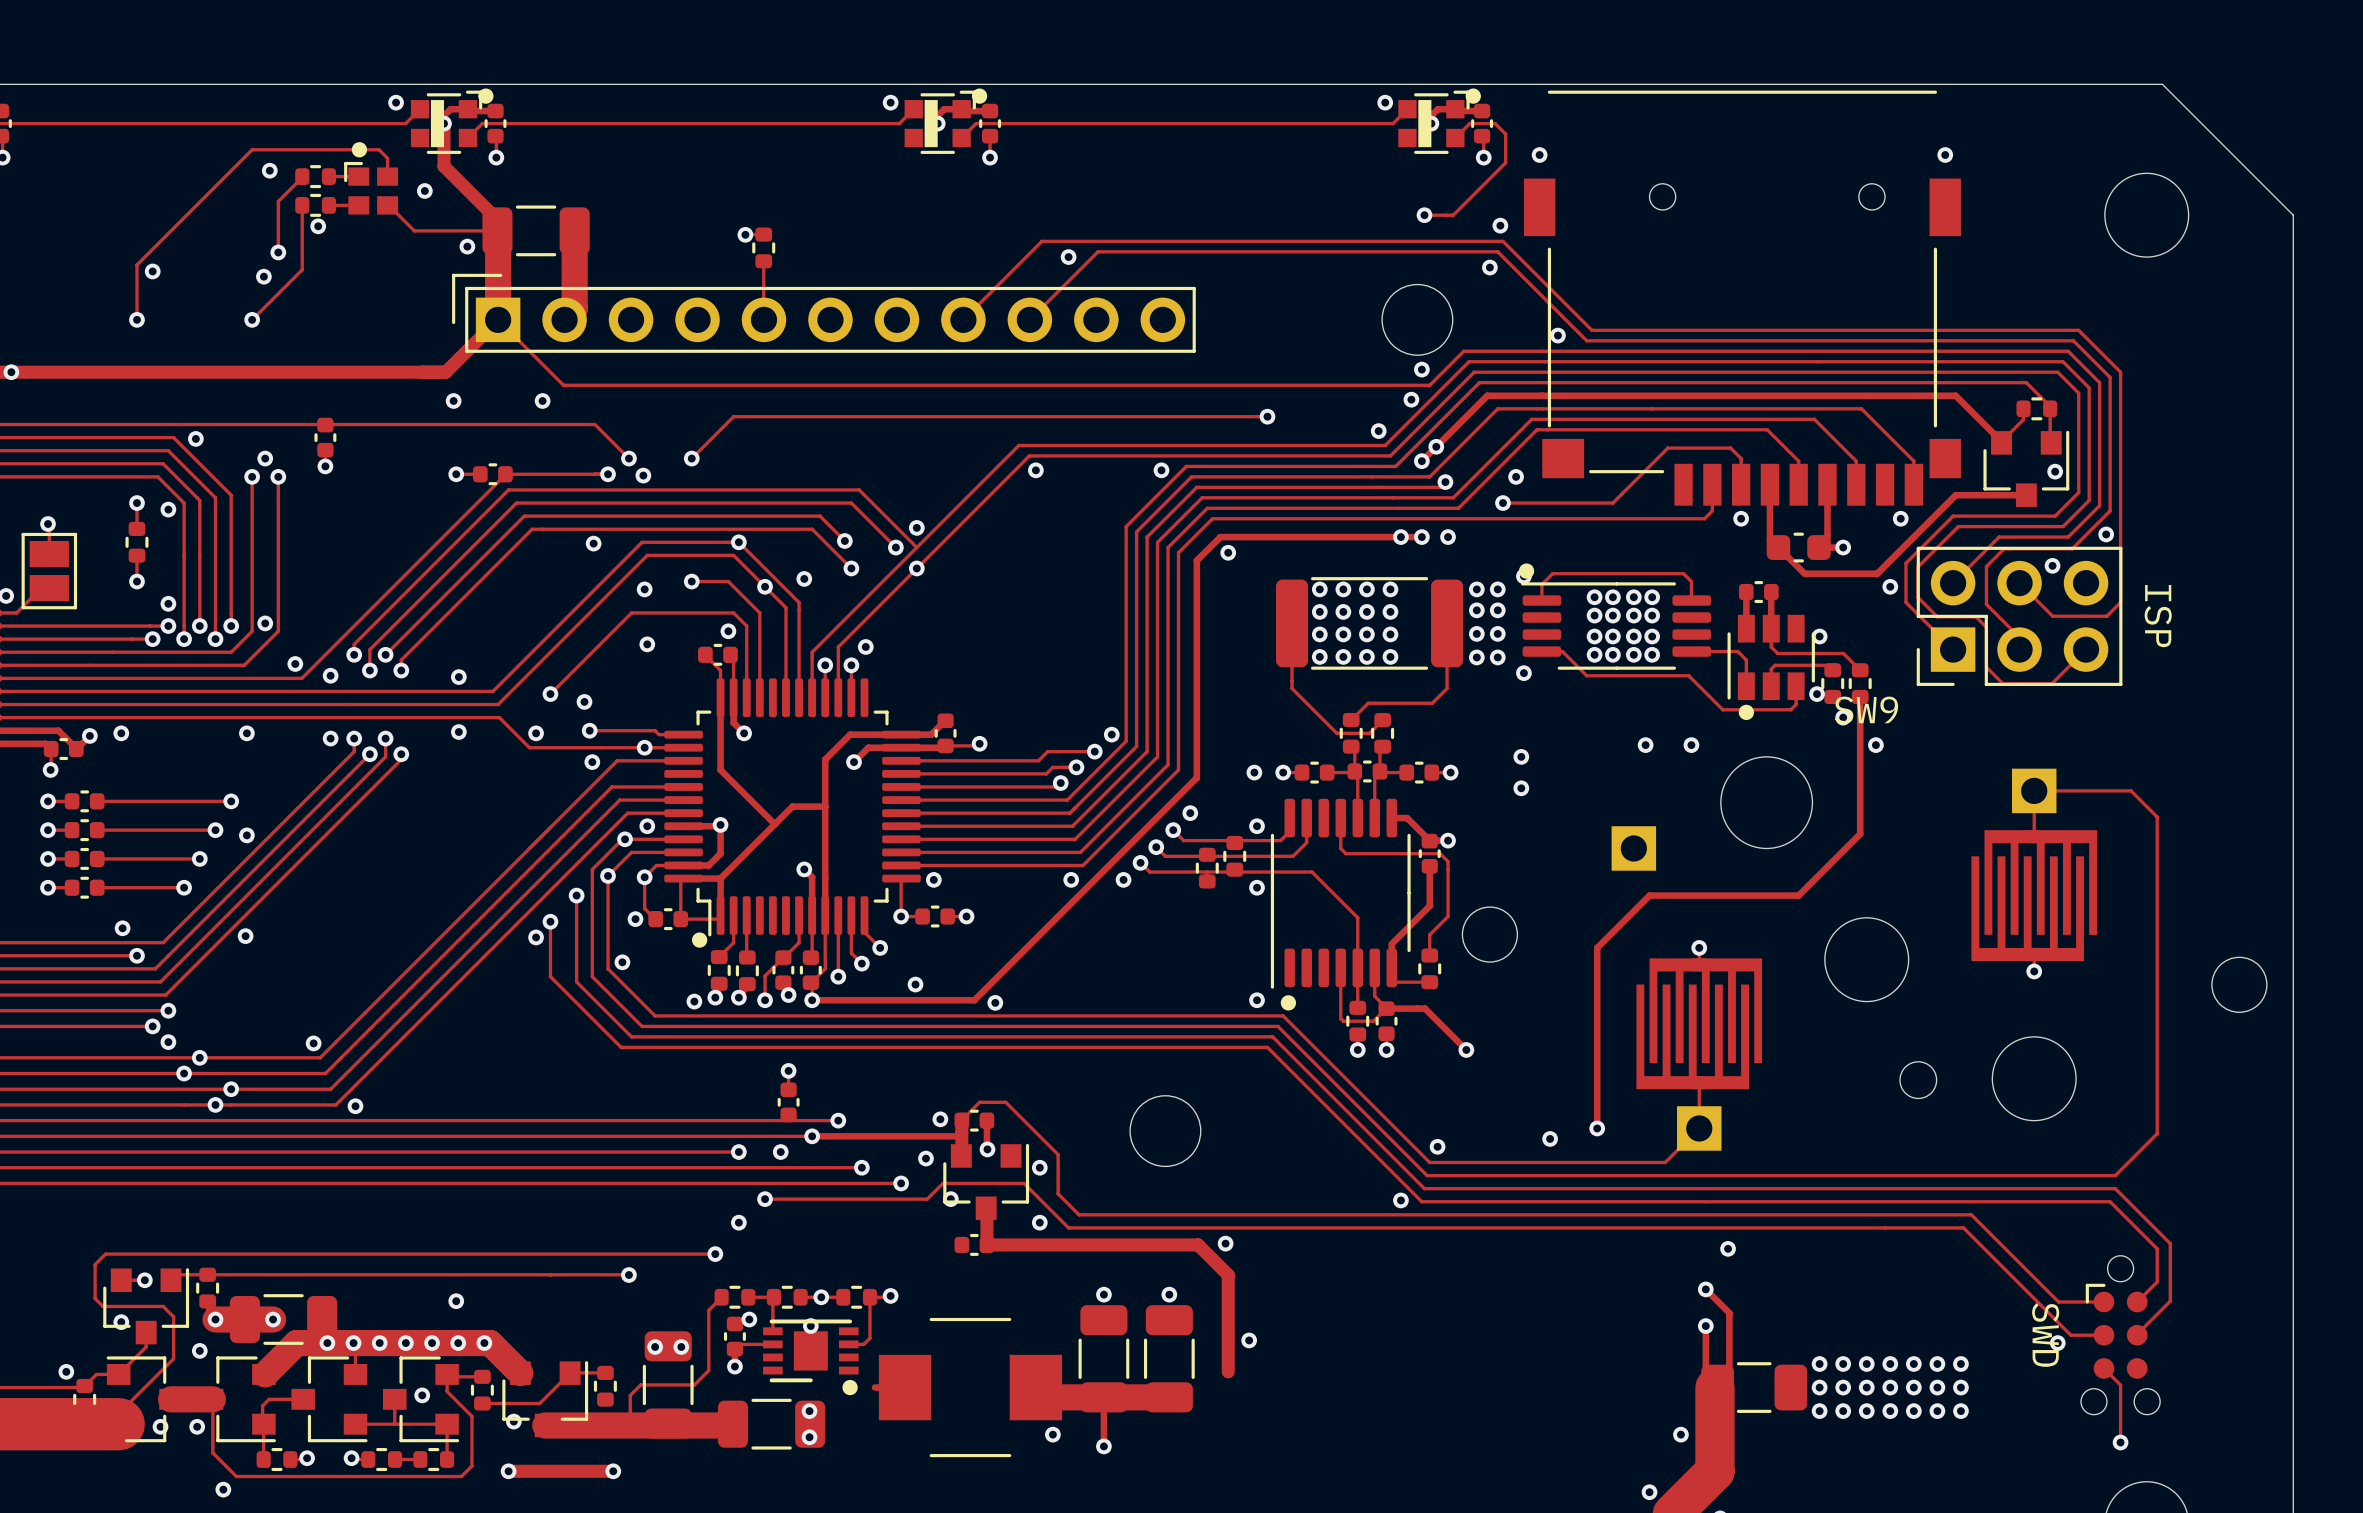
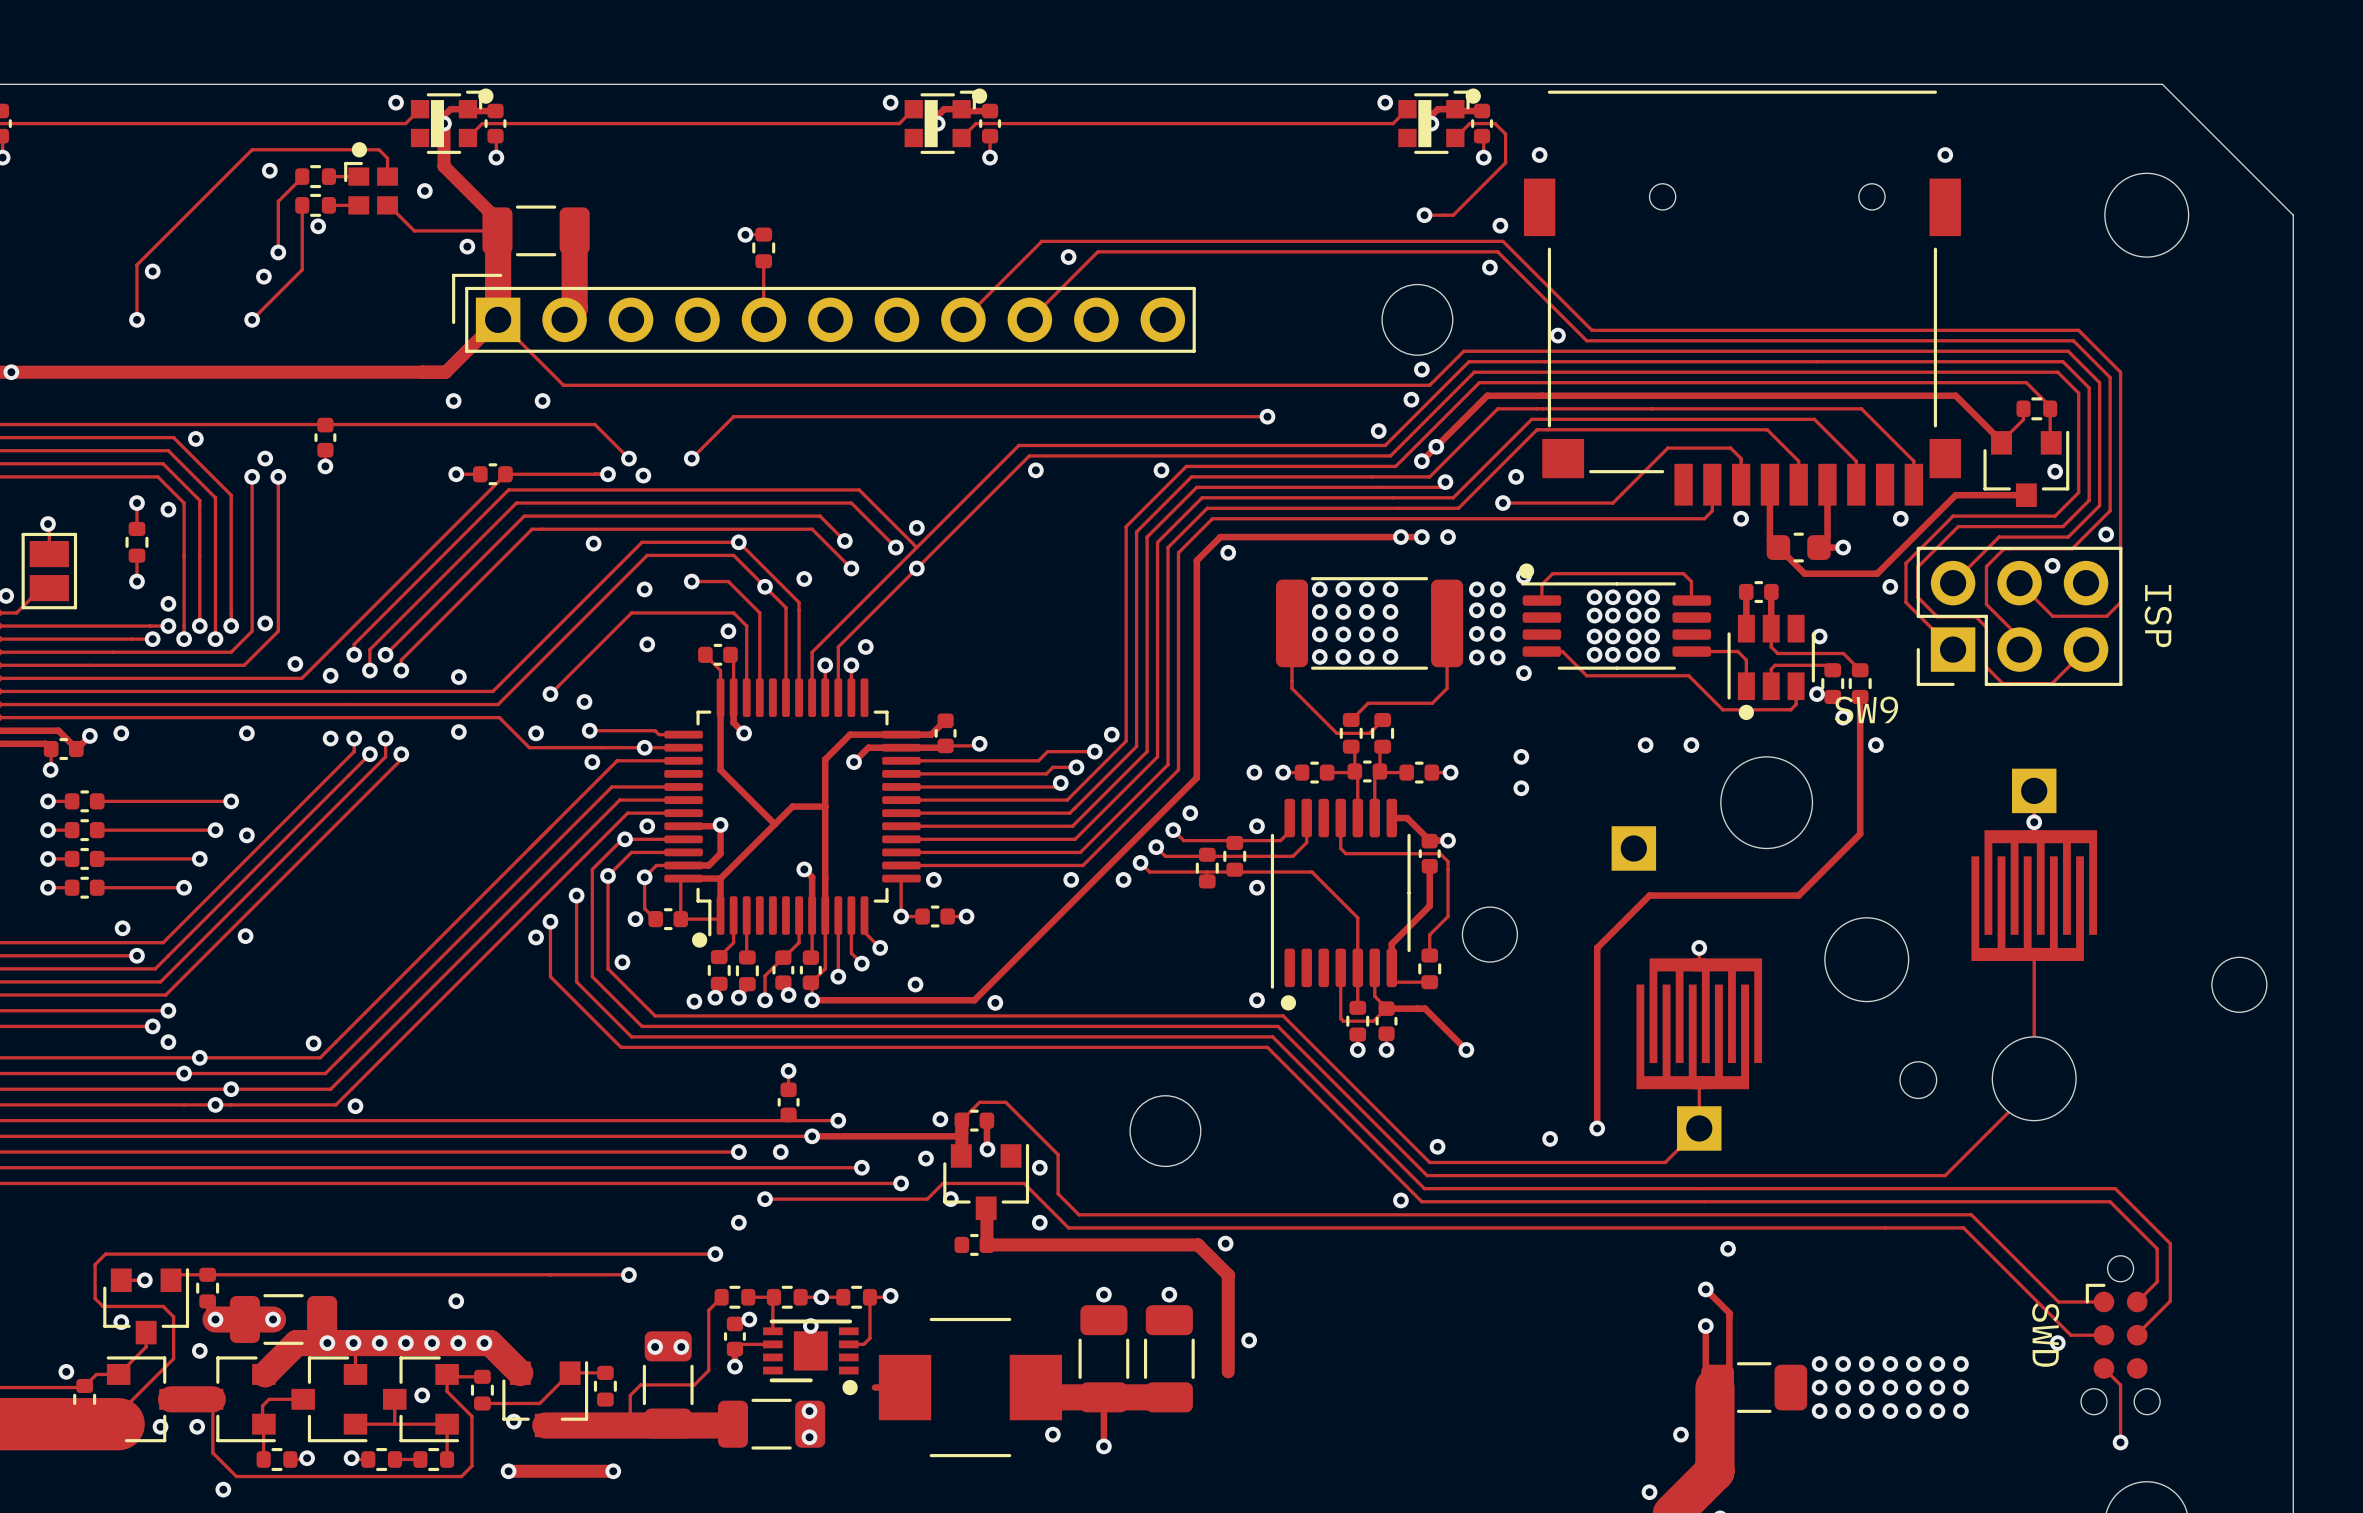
track: (2034, 790) (2131, 790) (2157, 817) (2157, 1133) (2115, 1175) (1945, 1175) -> (2034, 971) (2034, 1086) (1945, 1175)
via position: (2034, 971) -> (2034, 822)

